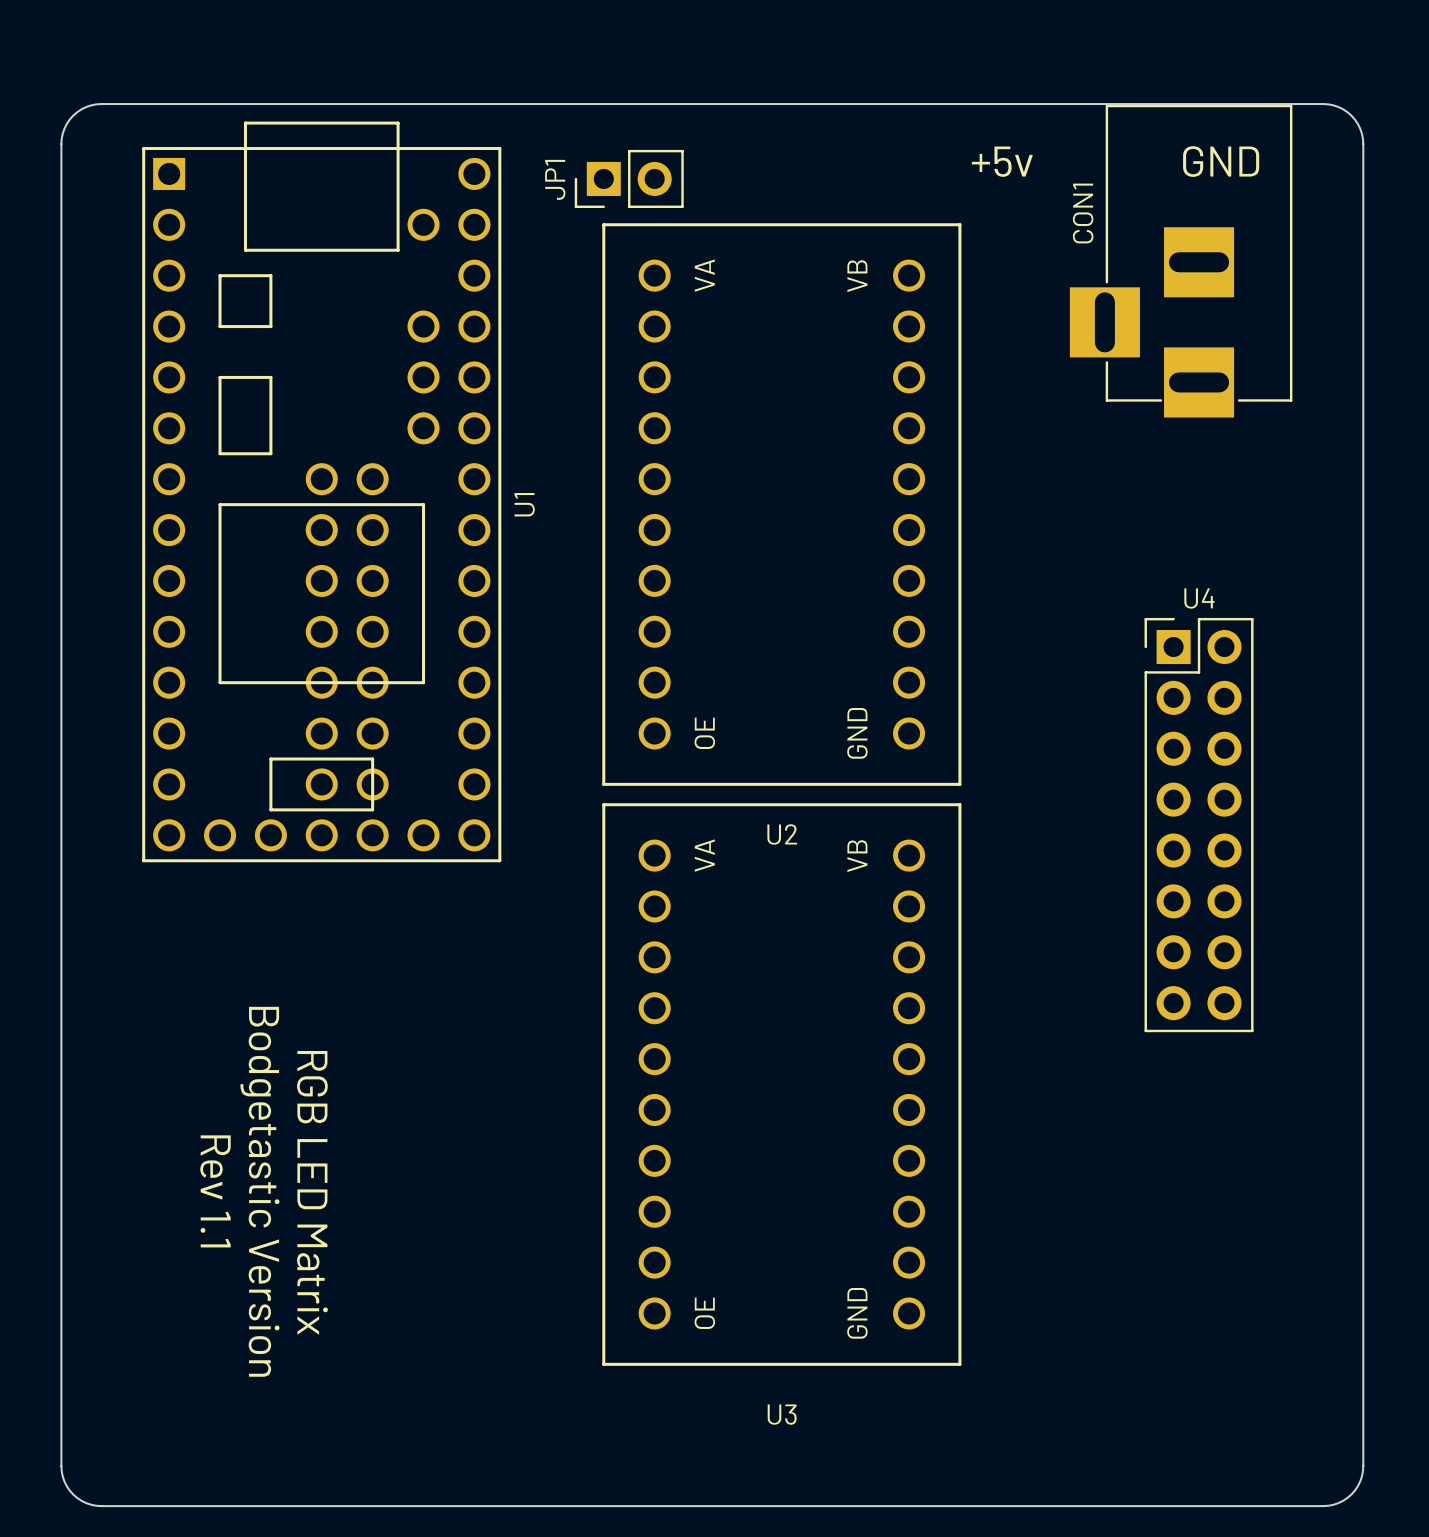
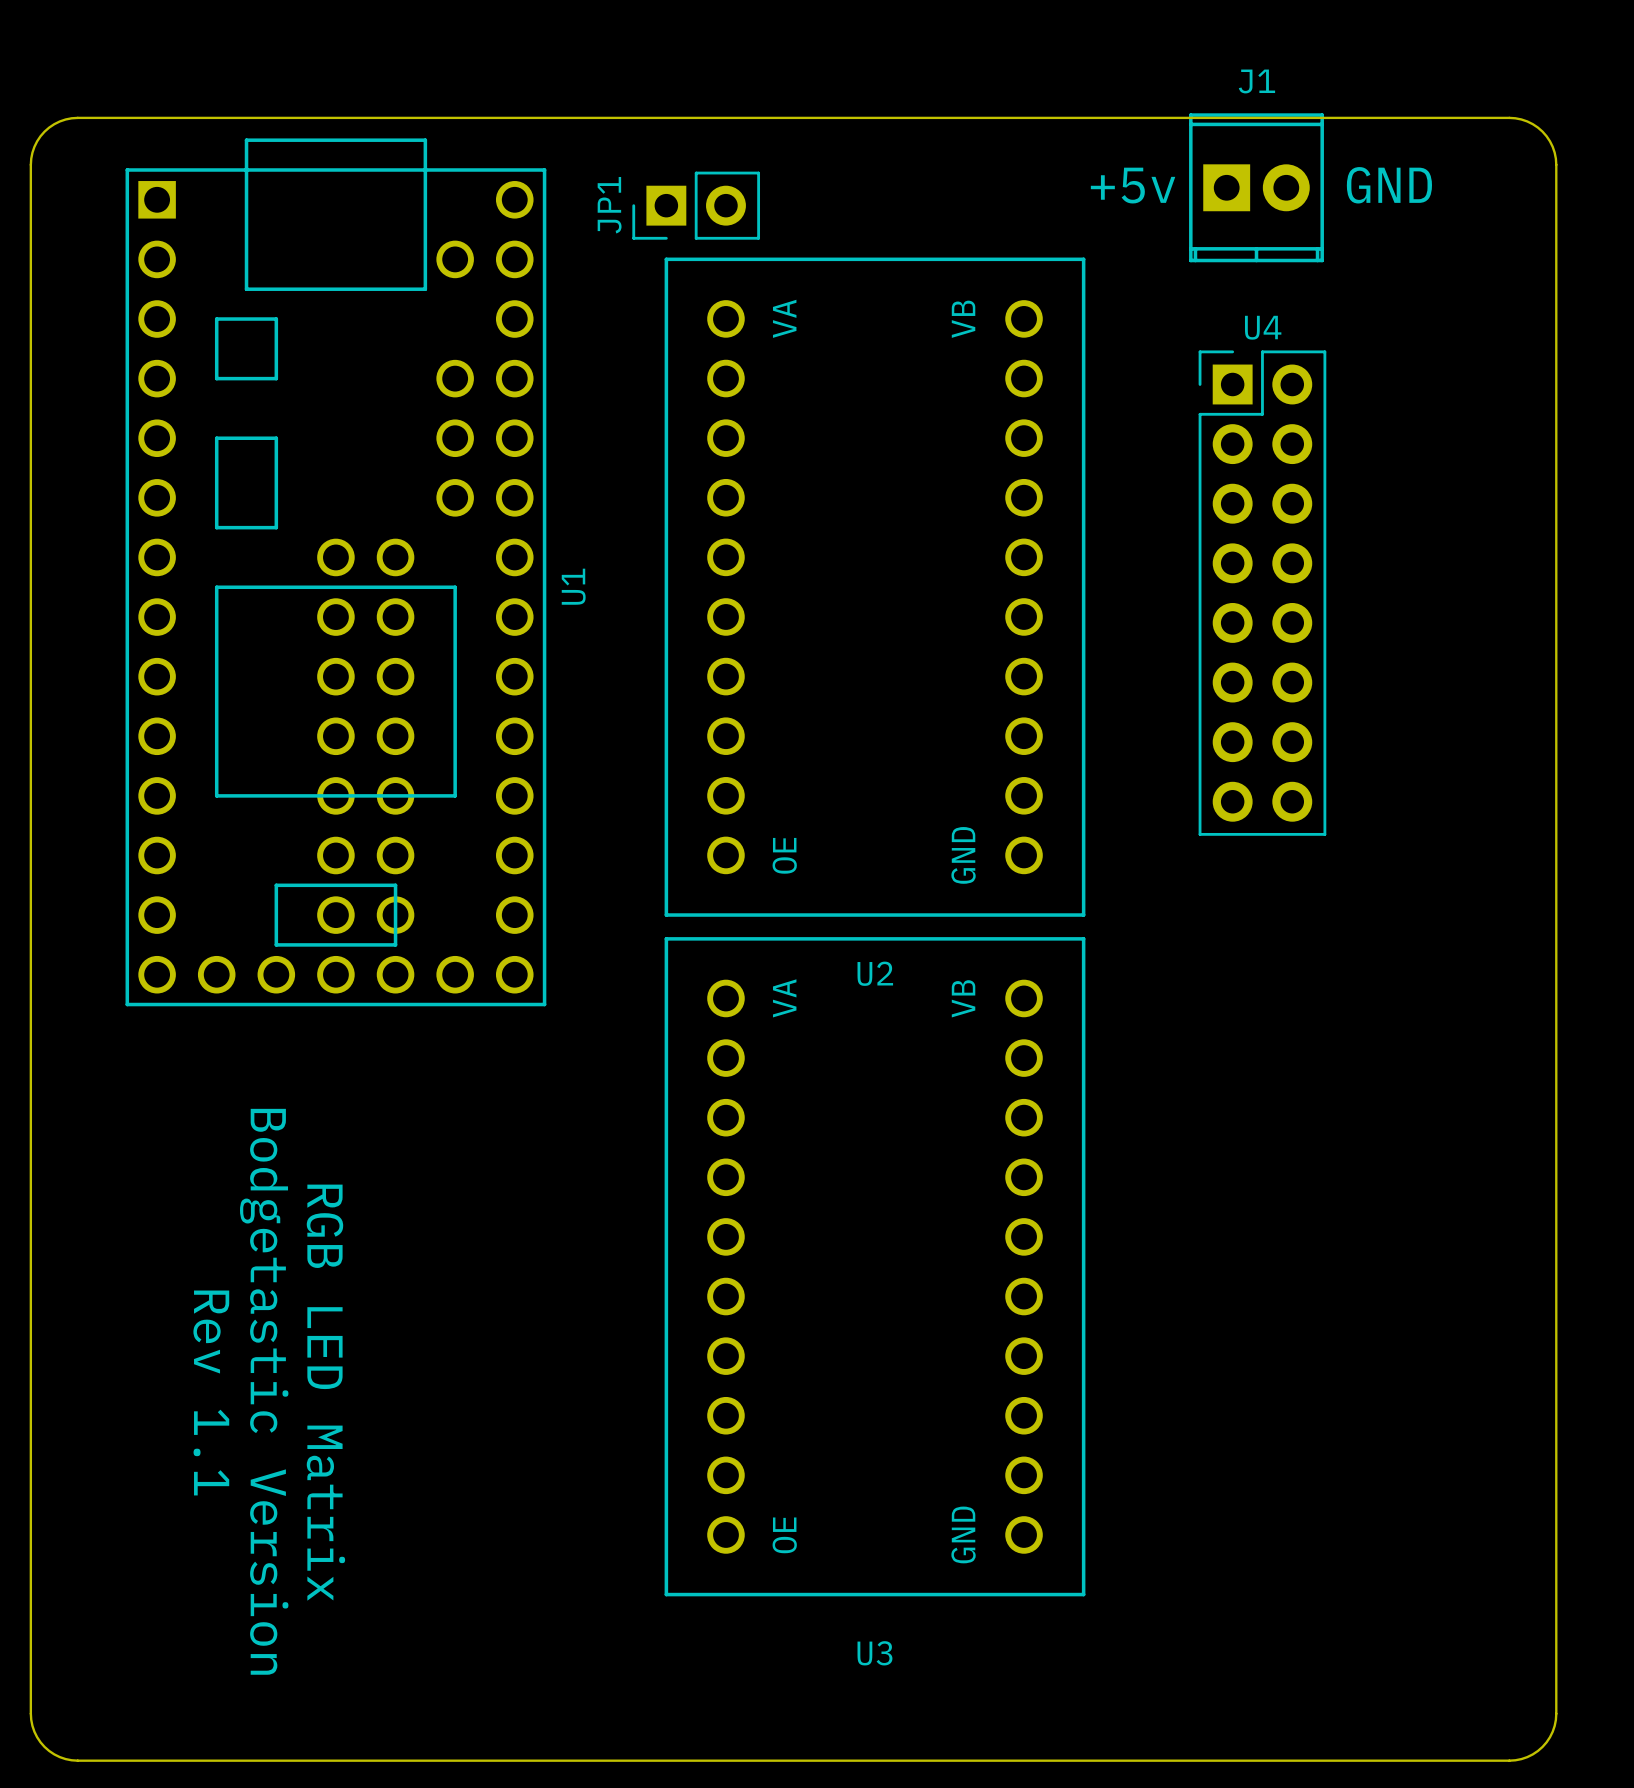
J1: none -> (1256, 187)
CON1: (1181, 261) -> none
U4 position: (1199, 825) -> (1262, 593)

